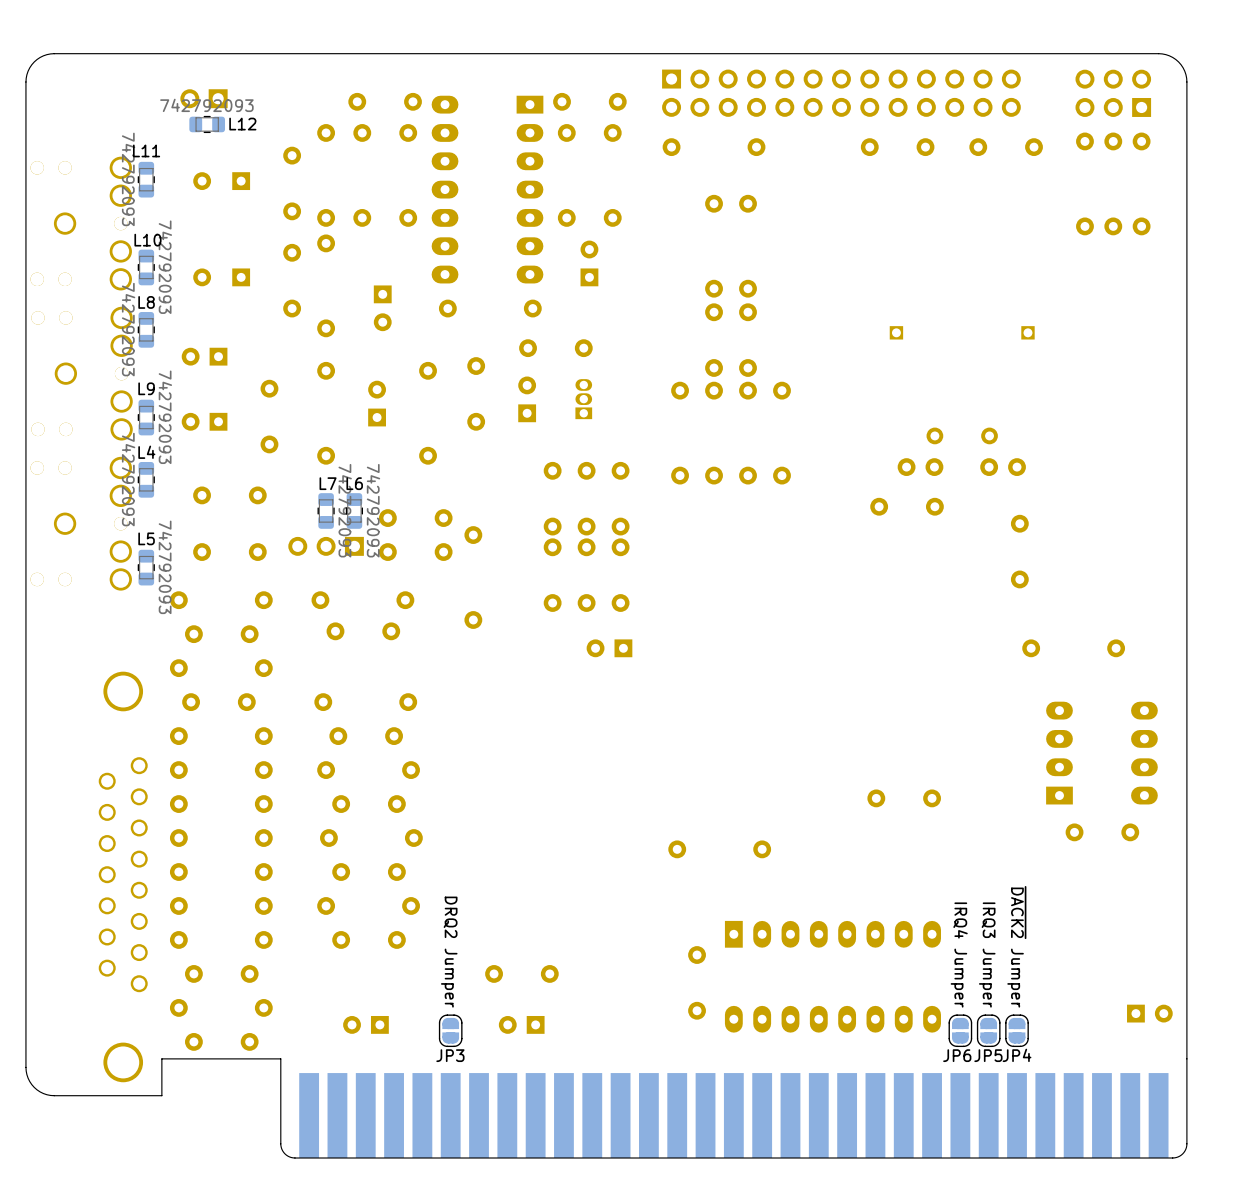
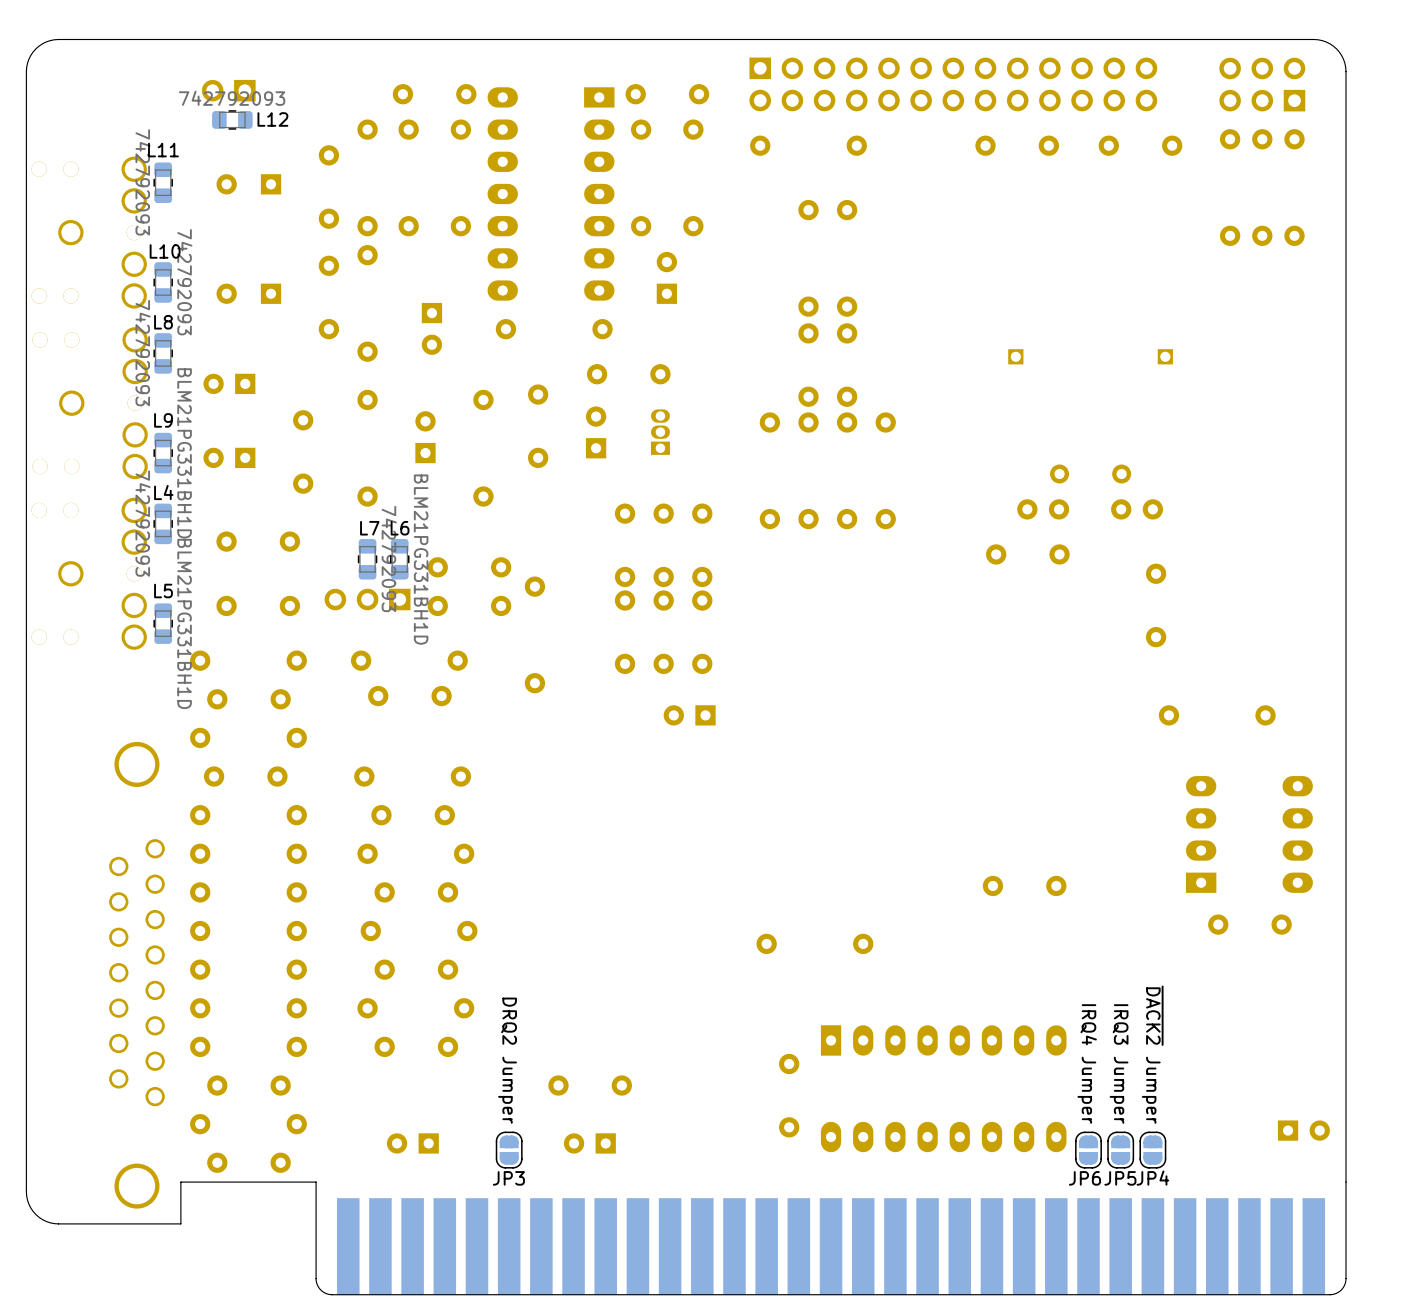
L9 value: 742792093 (165, 417) -> BLM21PG331BH1D (184, 453)
L6 value: 742792093 (373, 510) -> BLM21PG331BH1D (421, 559)
L5 value: 742792093 (165, 567) -> BLM21PG331BH1D (184, 623)

